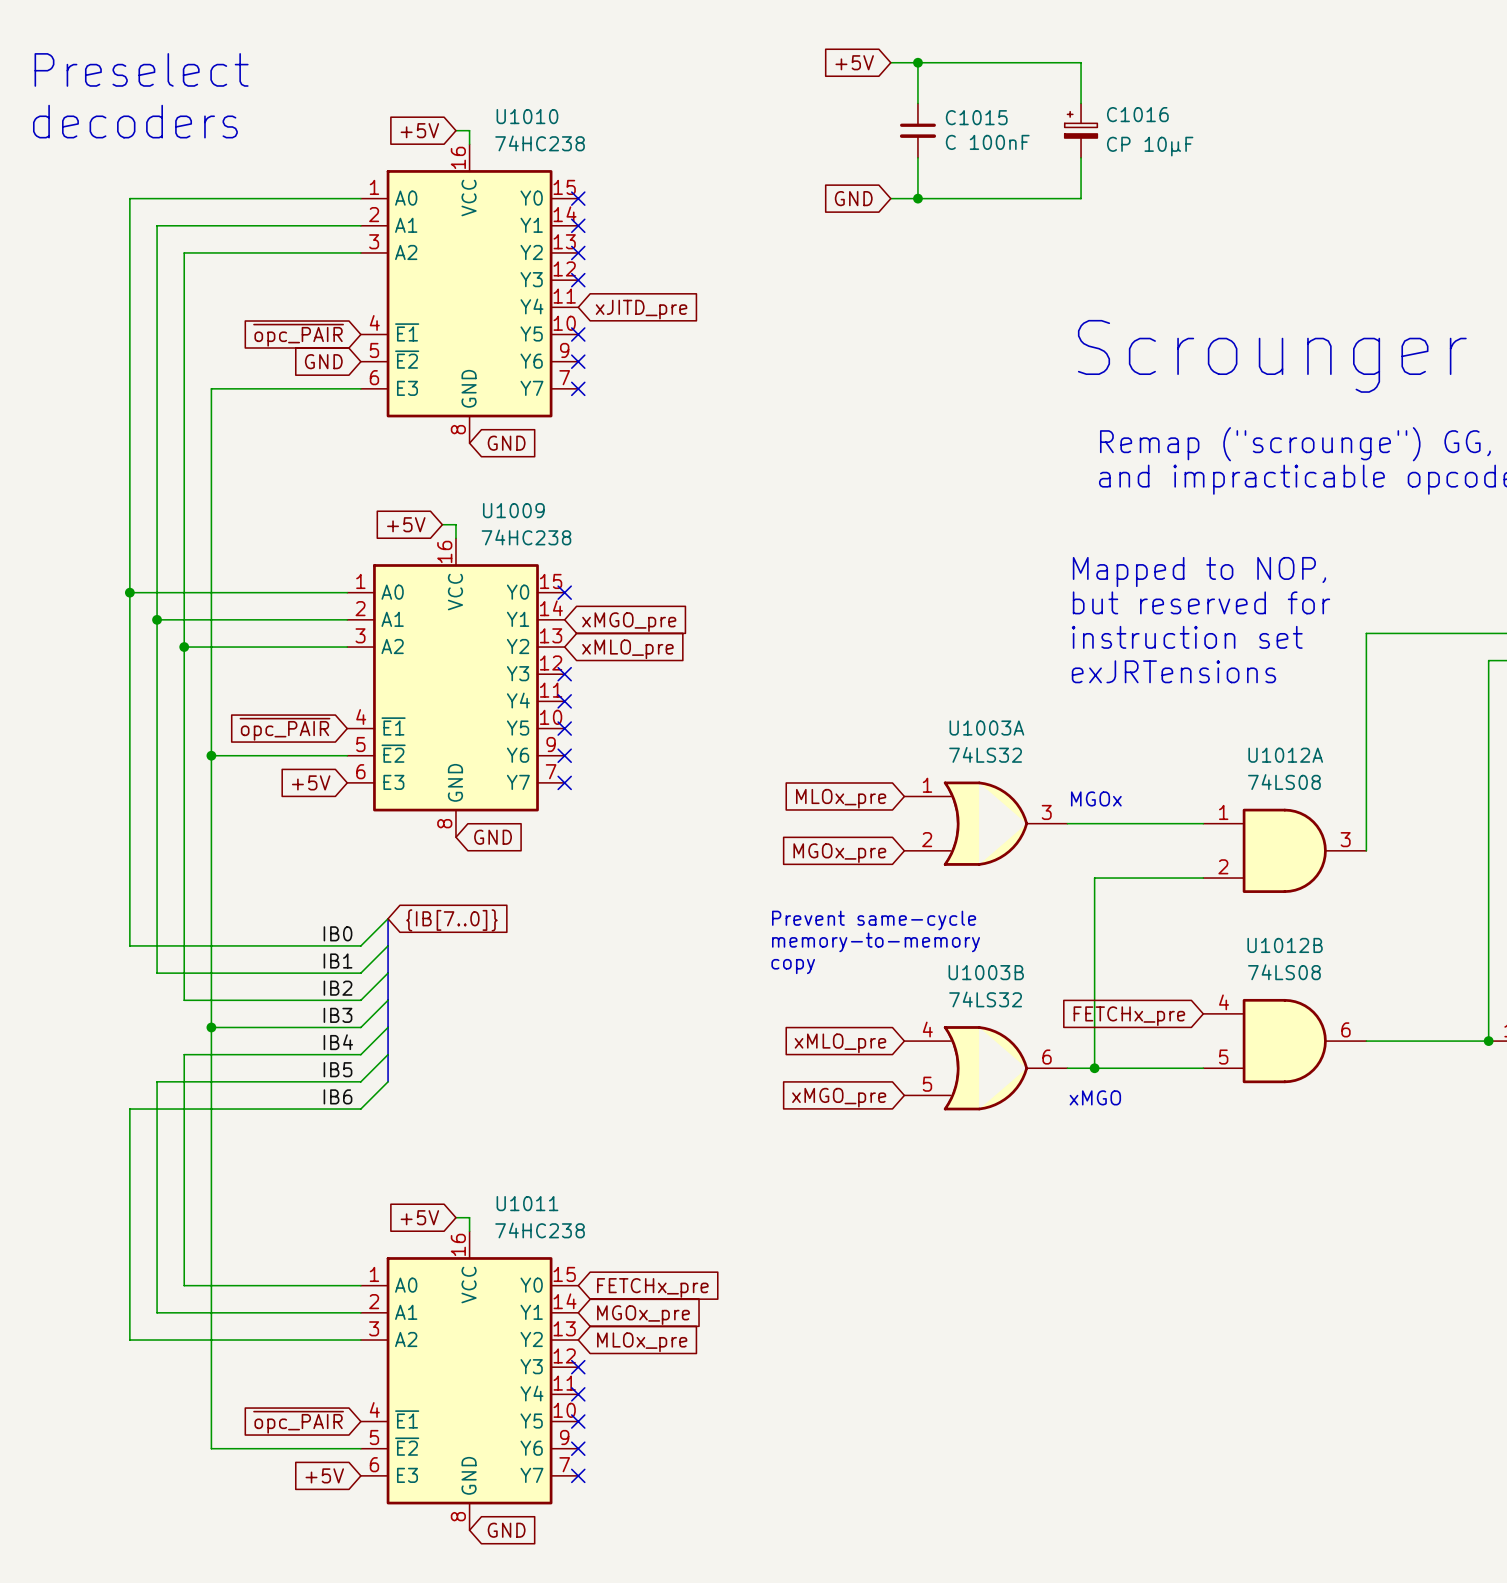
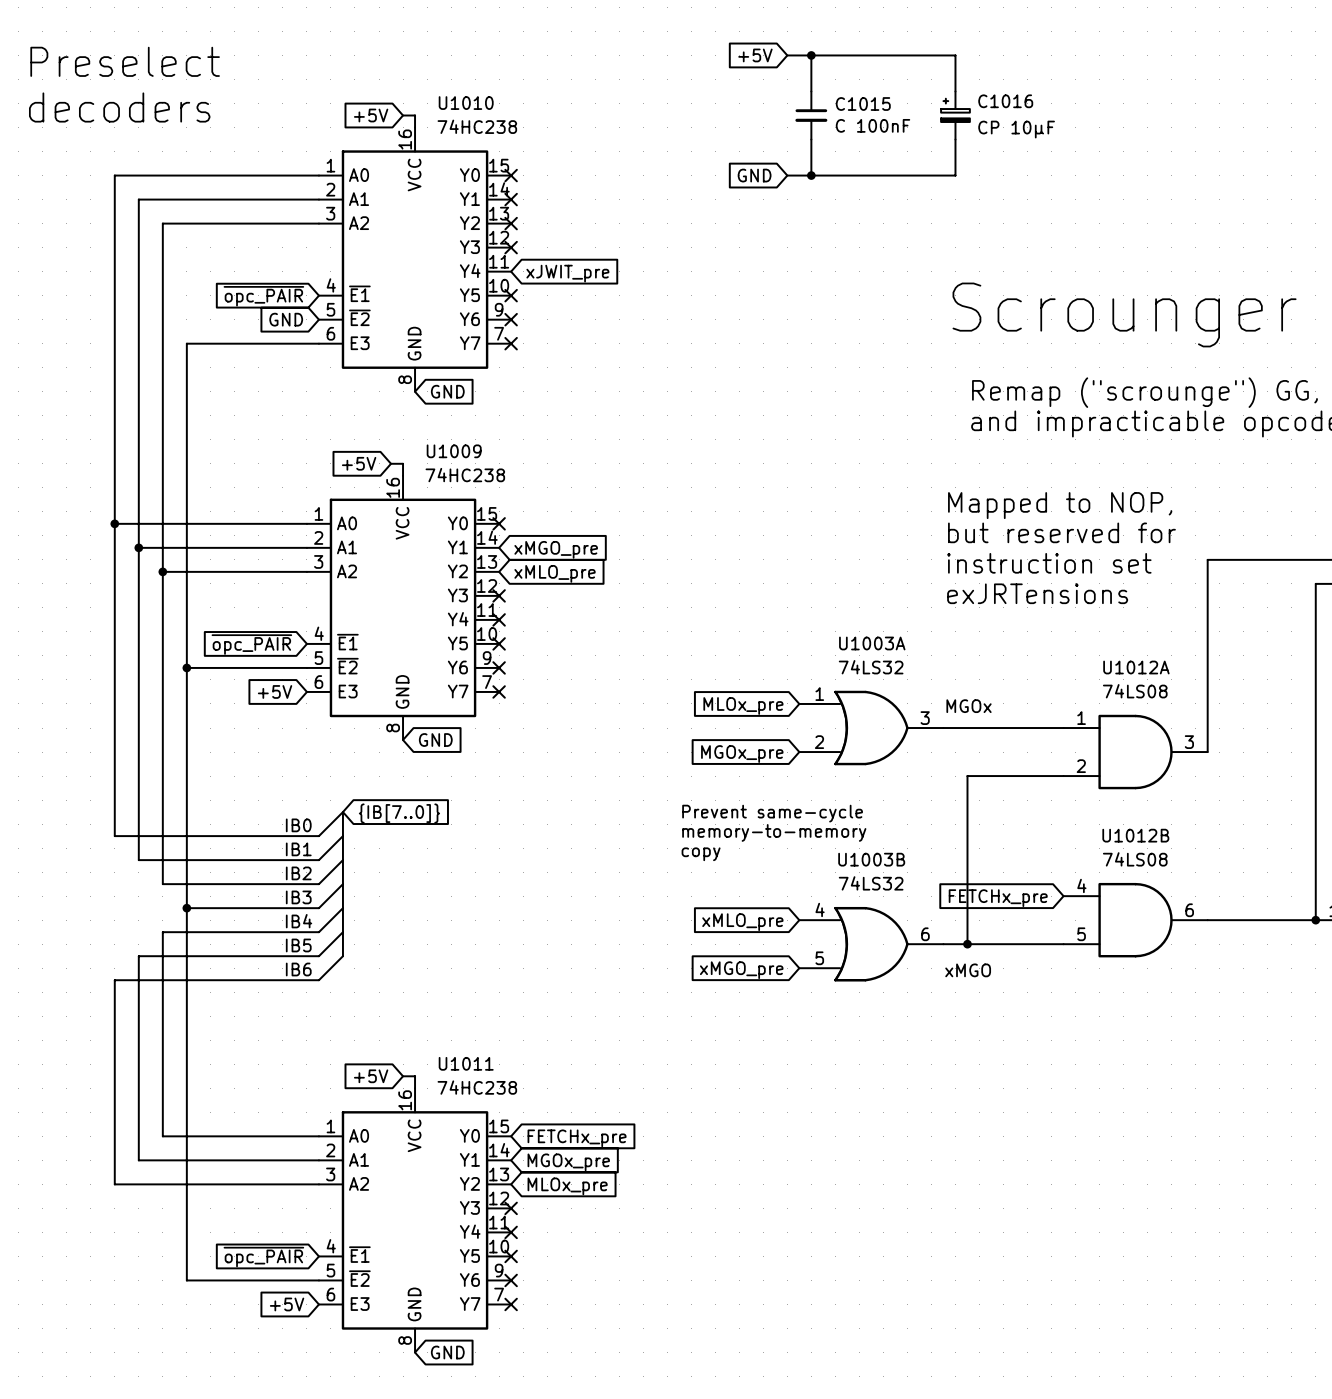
global label: xJITD_pre (641, 309) -> xJWIT_pre (567, 273)

